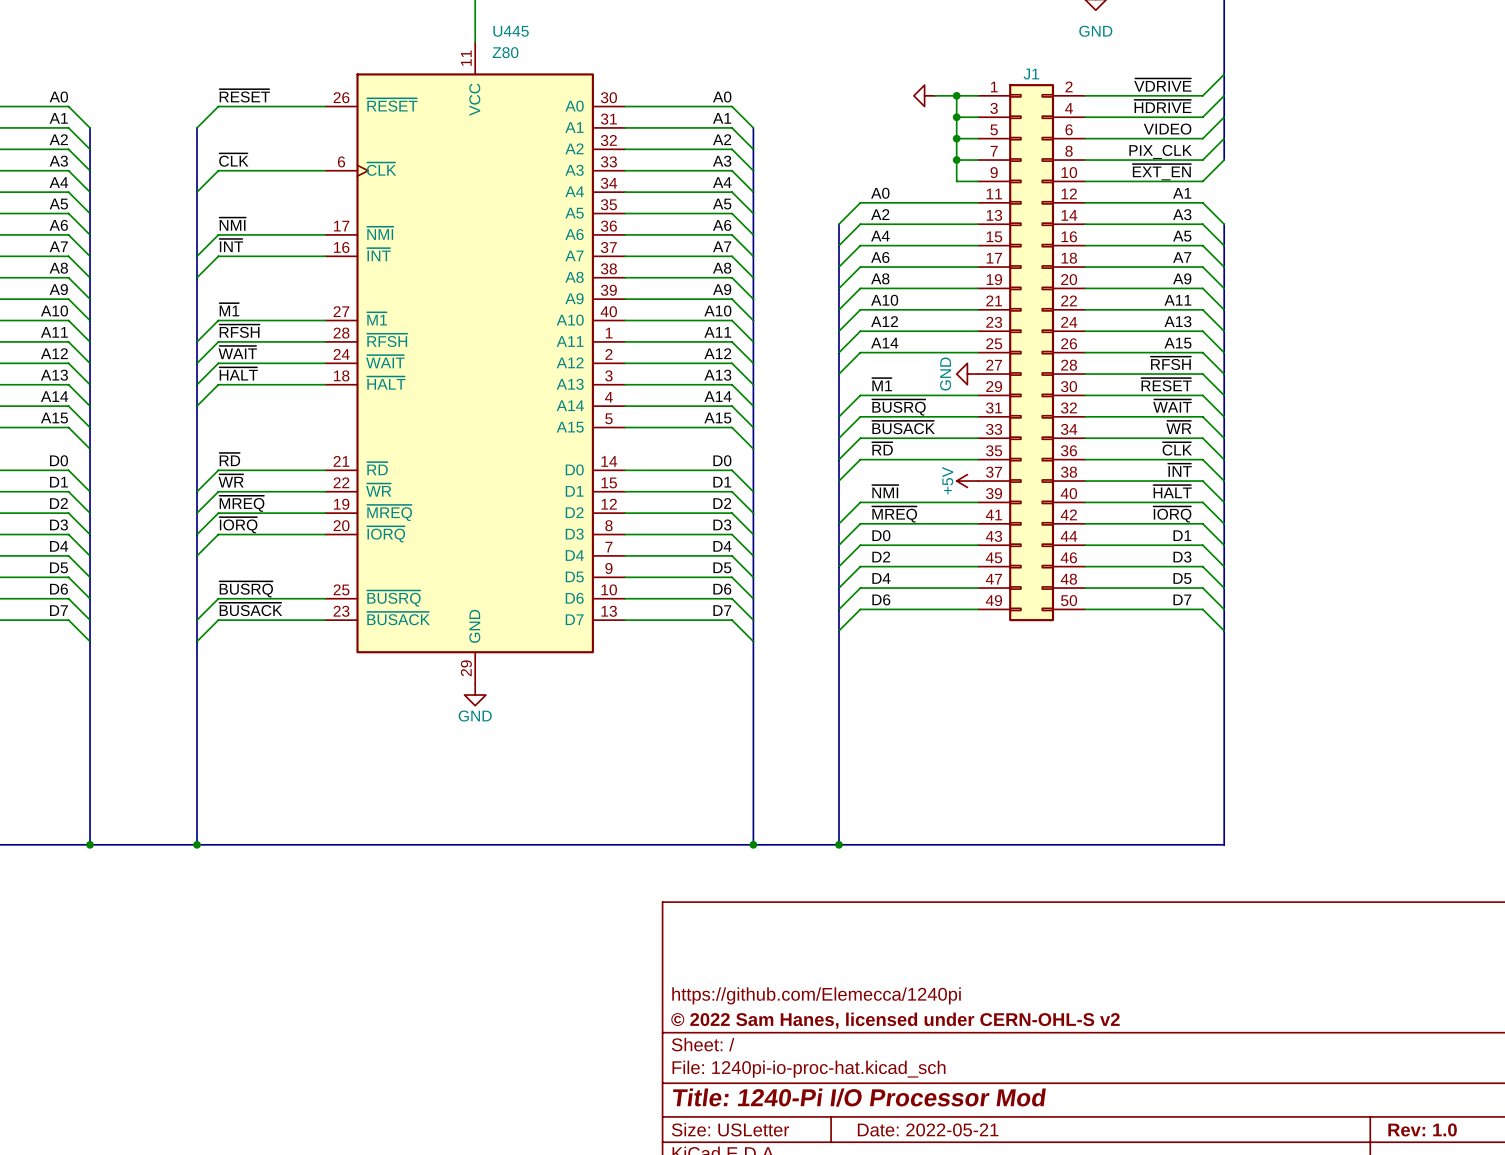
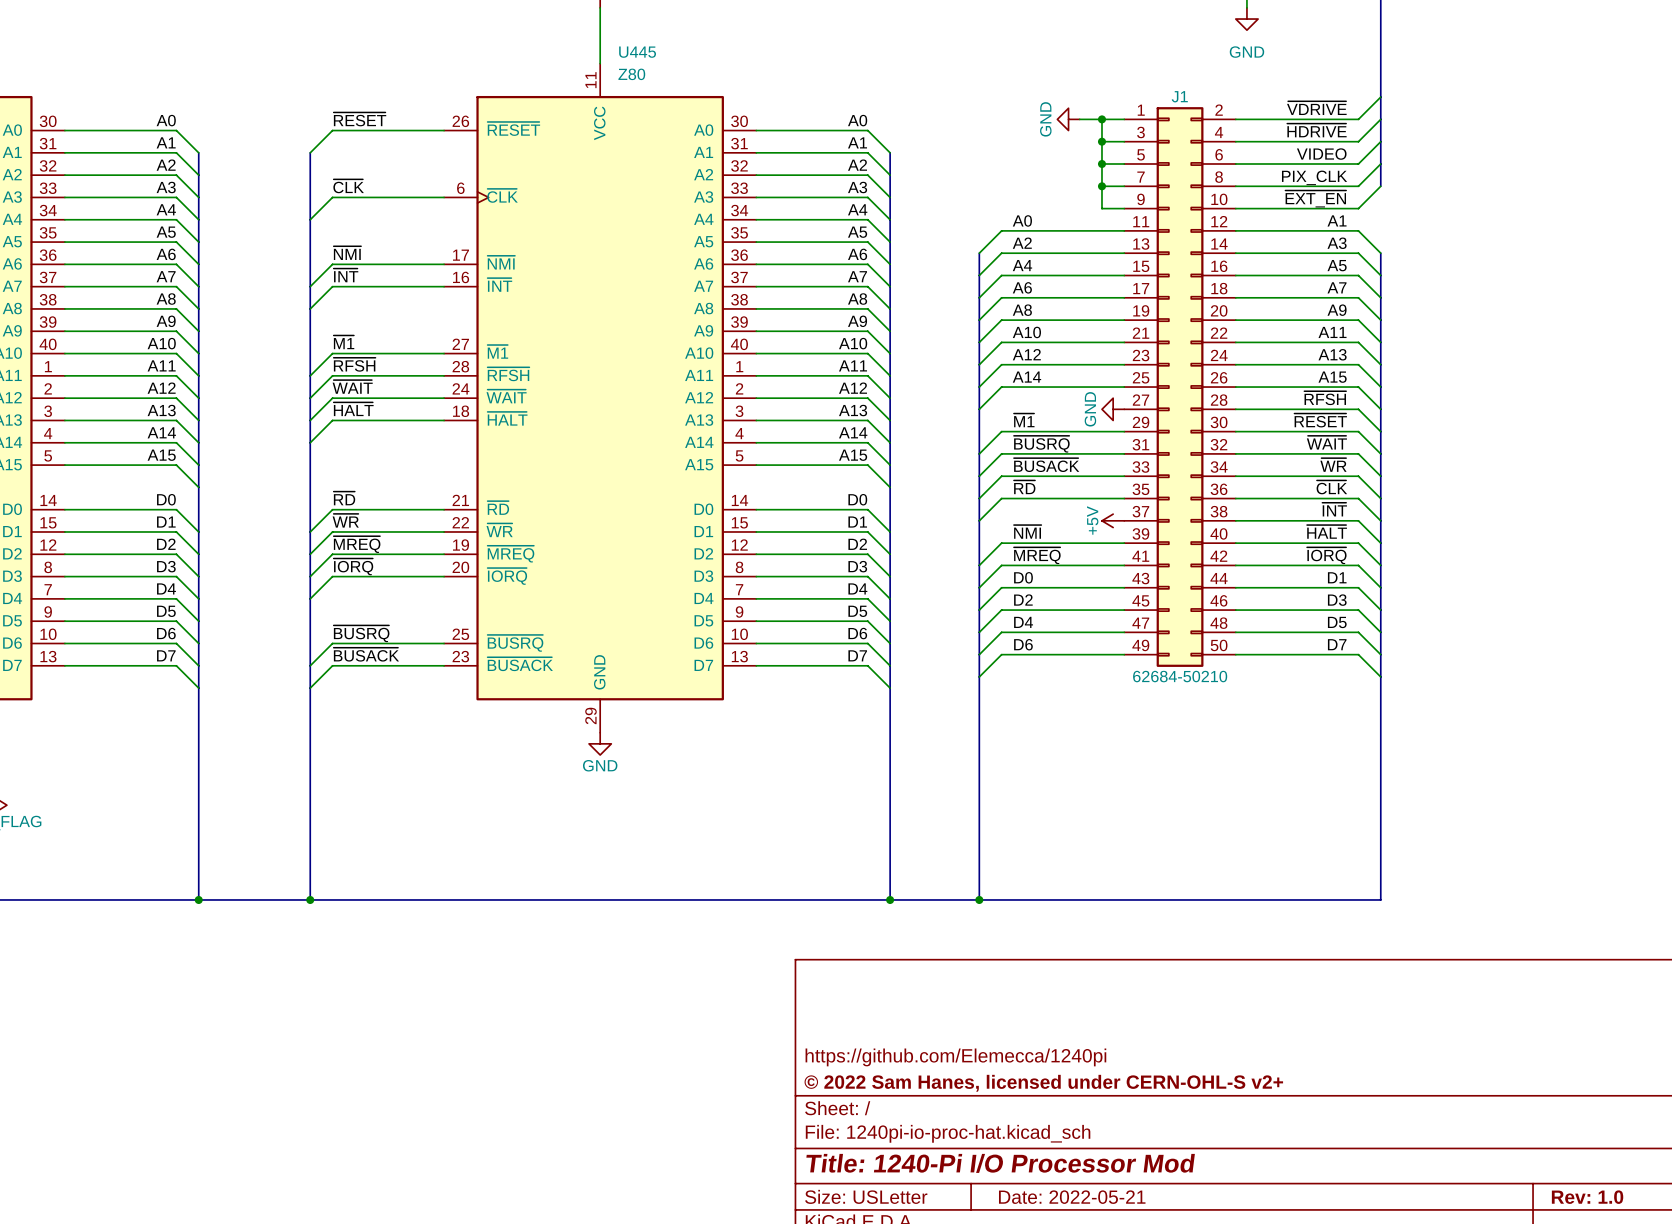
power symbol text: none -> GND (1045, 119)
J1 value: none -> 62684-50210 (1180, 676)
title block: © 2022 Sam Hanes, licensed under CERN-OHL-S v2 (895, 1020) -> © 2022 Sam Hanes, licensed under CERN-OHL-S v2+ (1043, 1083)

